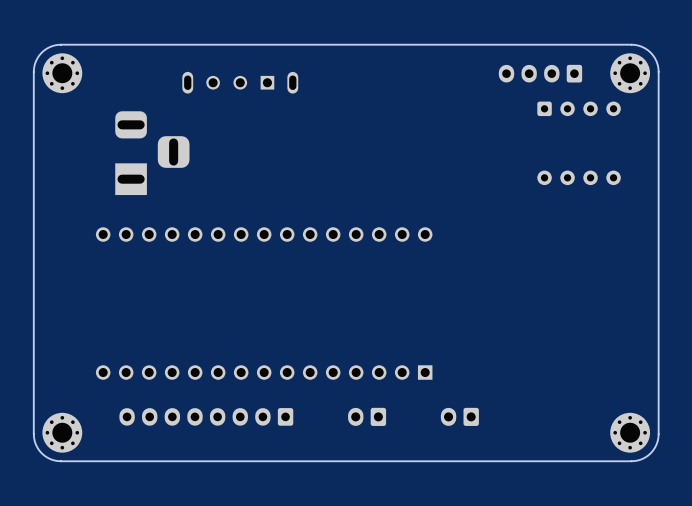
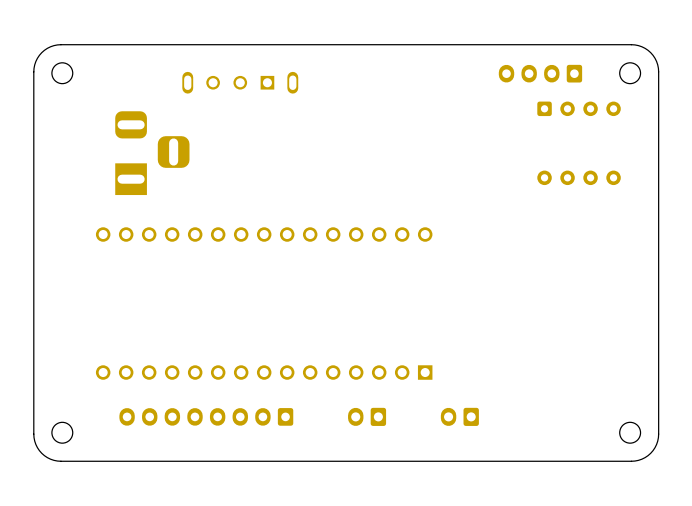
round board edge: none -> [51, 62, 73, 84]
round board edge: none -> [619, 62, 641, 84]
part: (62, 73) -> none
part: (630, 73) -> none
round board edge: none -> [51, 422, 73, 444]
round board edge: none -> [619, 422, 641, 444]
part: (62, 432) -> none
part: (630, 432) -> none

